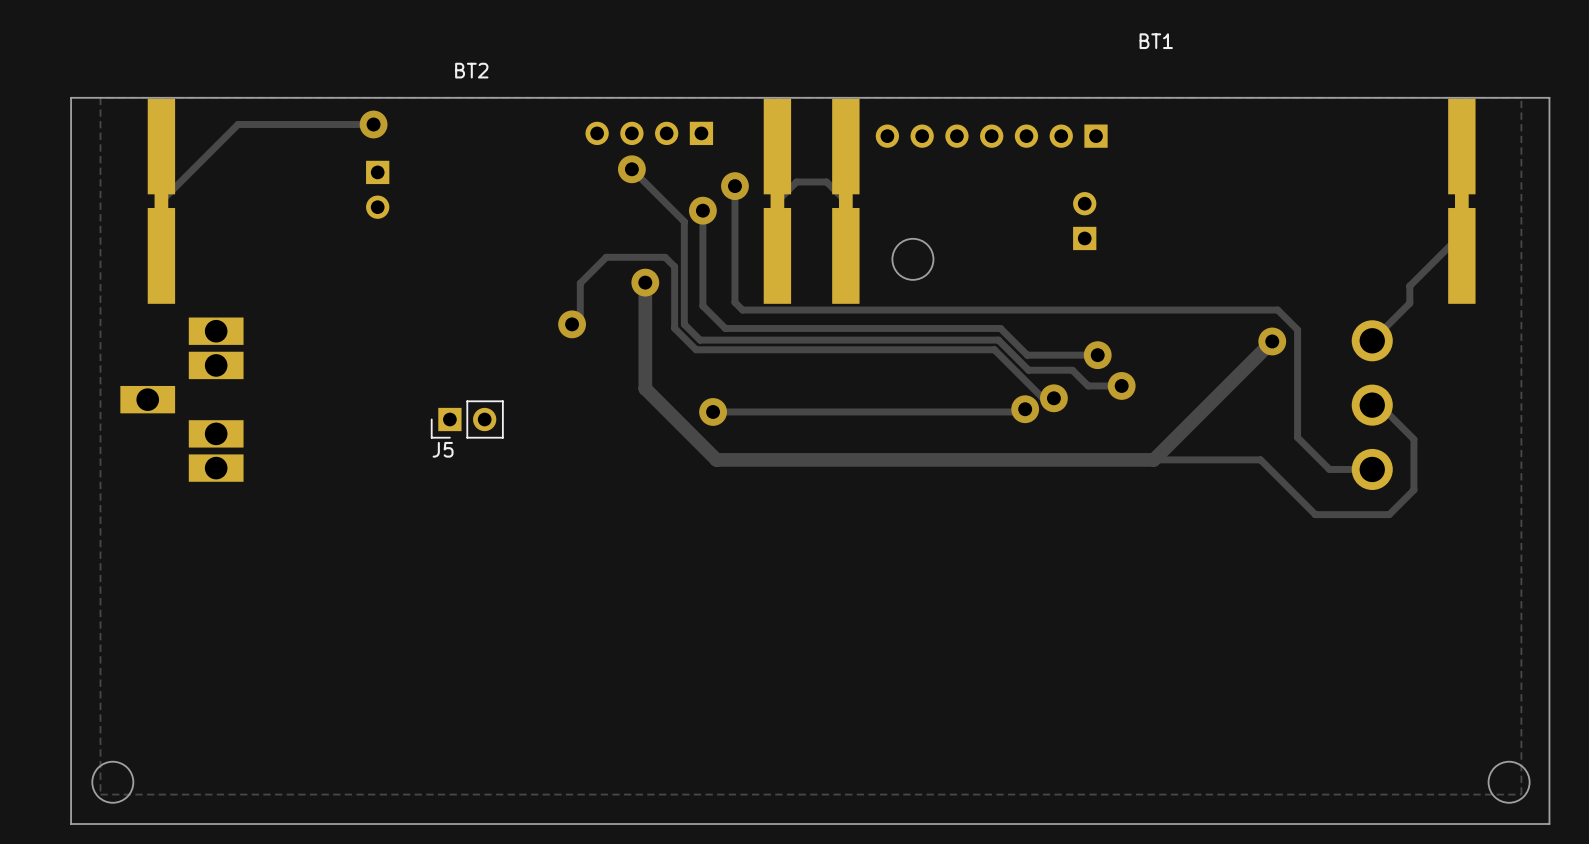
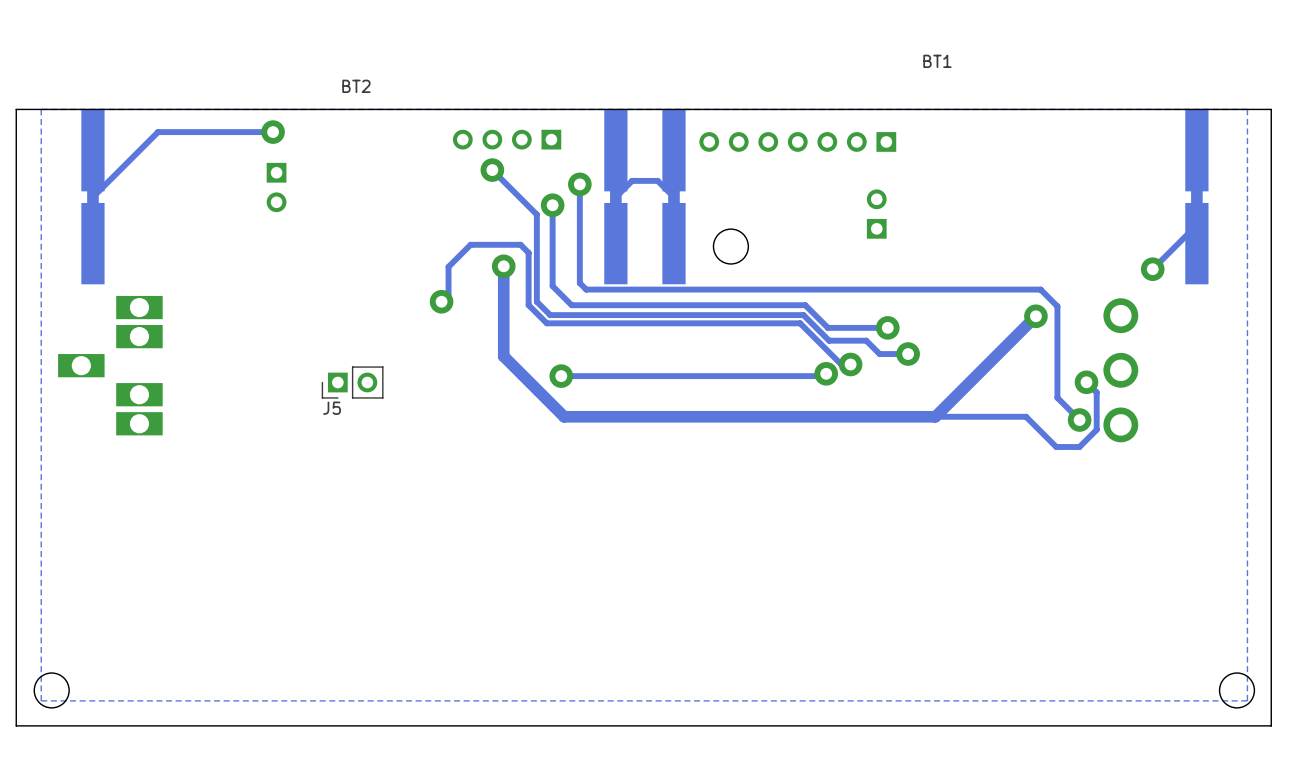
track: (1409, 286) (1409, 303) (1372, 340) -> none
via: none -> (1152, 269)
track: (1372, 405) (1379, 405) (1413, 439) (1413, 490) (1389, 514) (1315, 514) (1296, 495) -> (1086, 382) (1096, 392) (1096, 429) (1079, 447) (1056, 447)
via: none -> (1086, 382)
track: (1323, 463) (1329, 469) (1372, 469) -> none
via: none -> (1079, 420)

